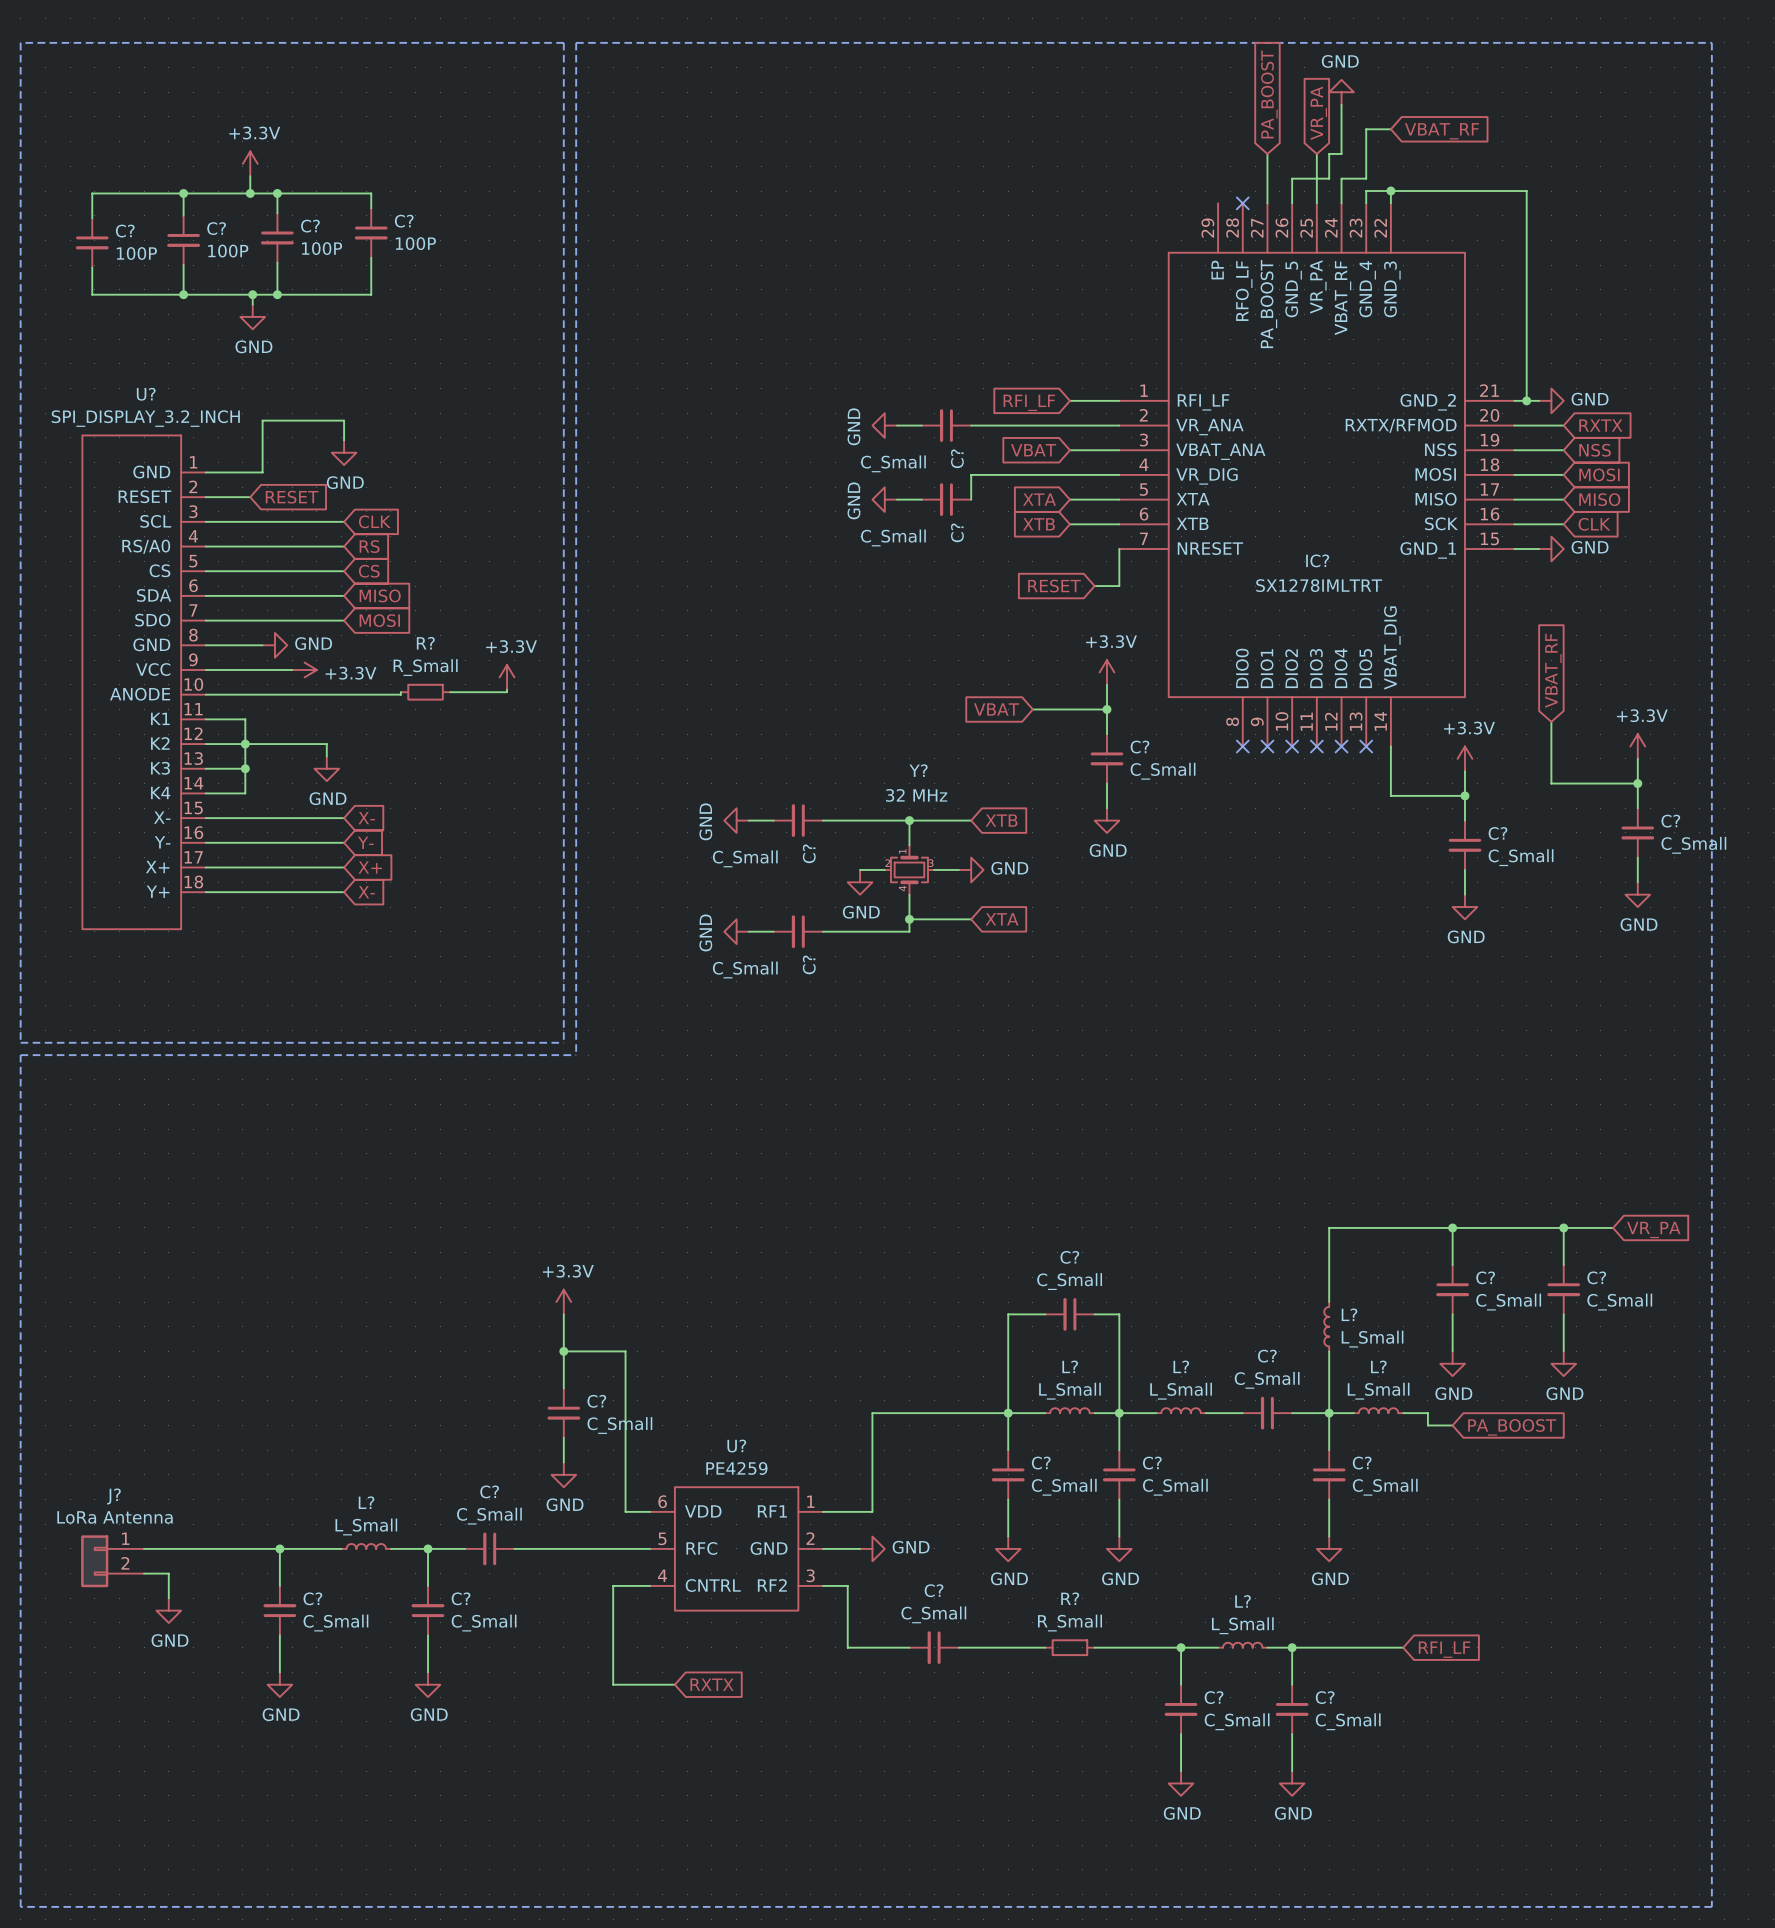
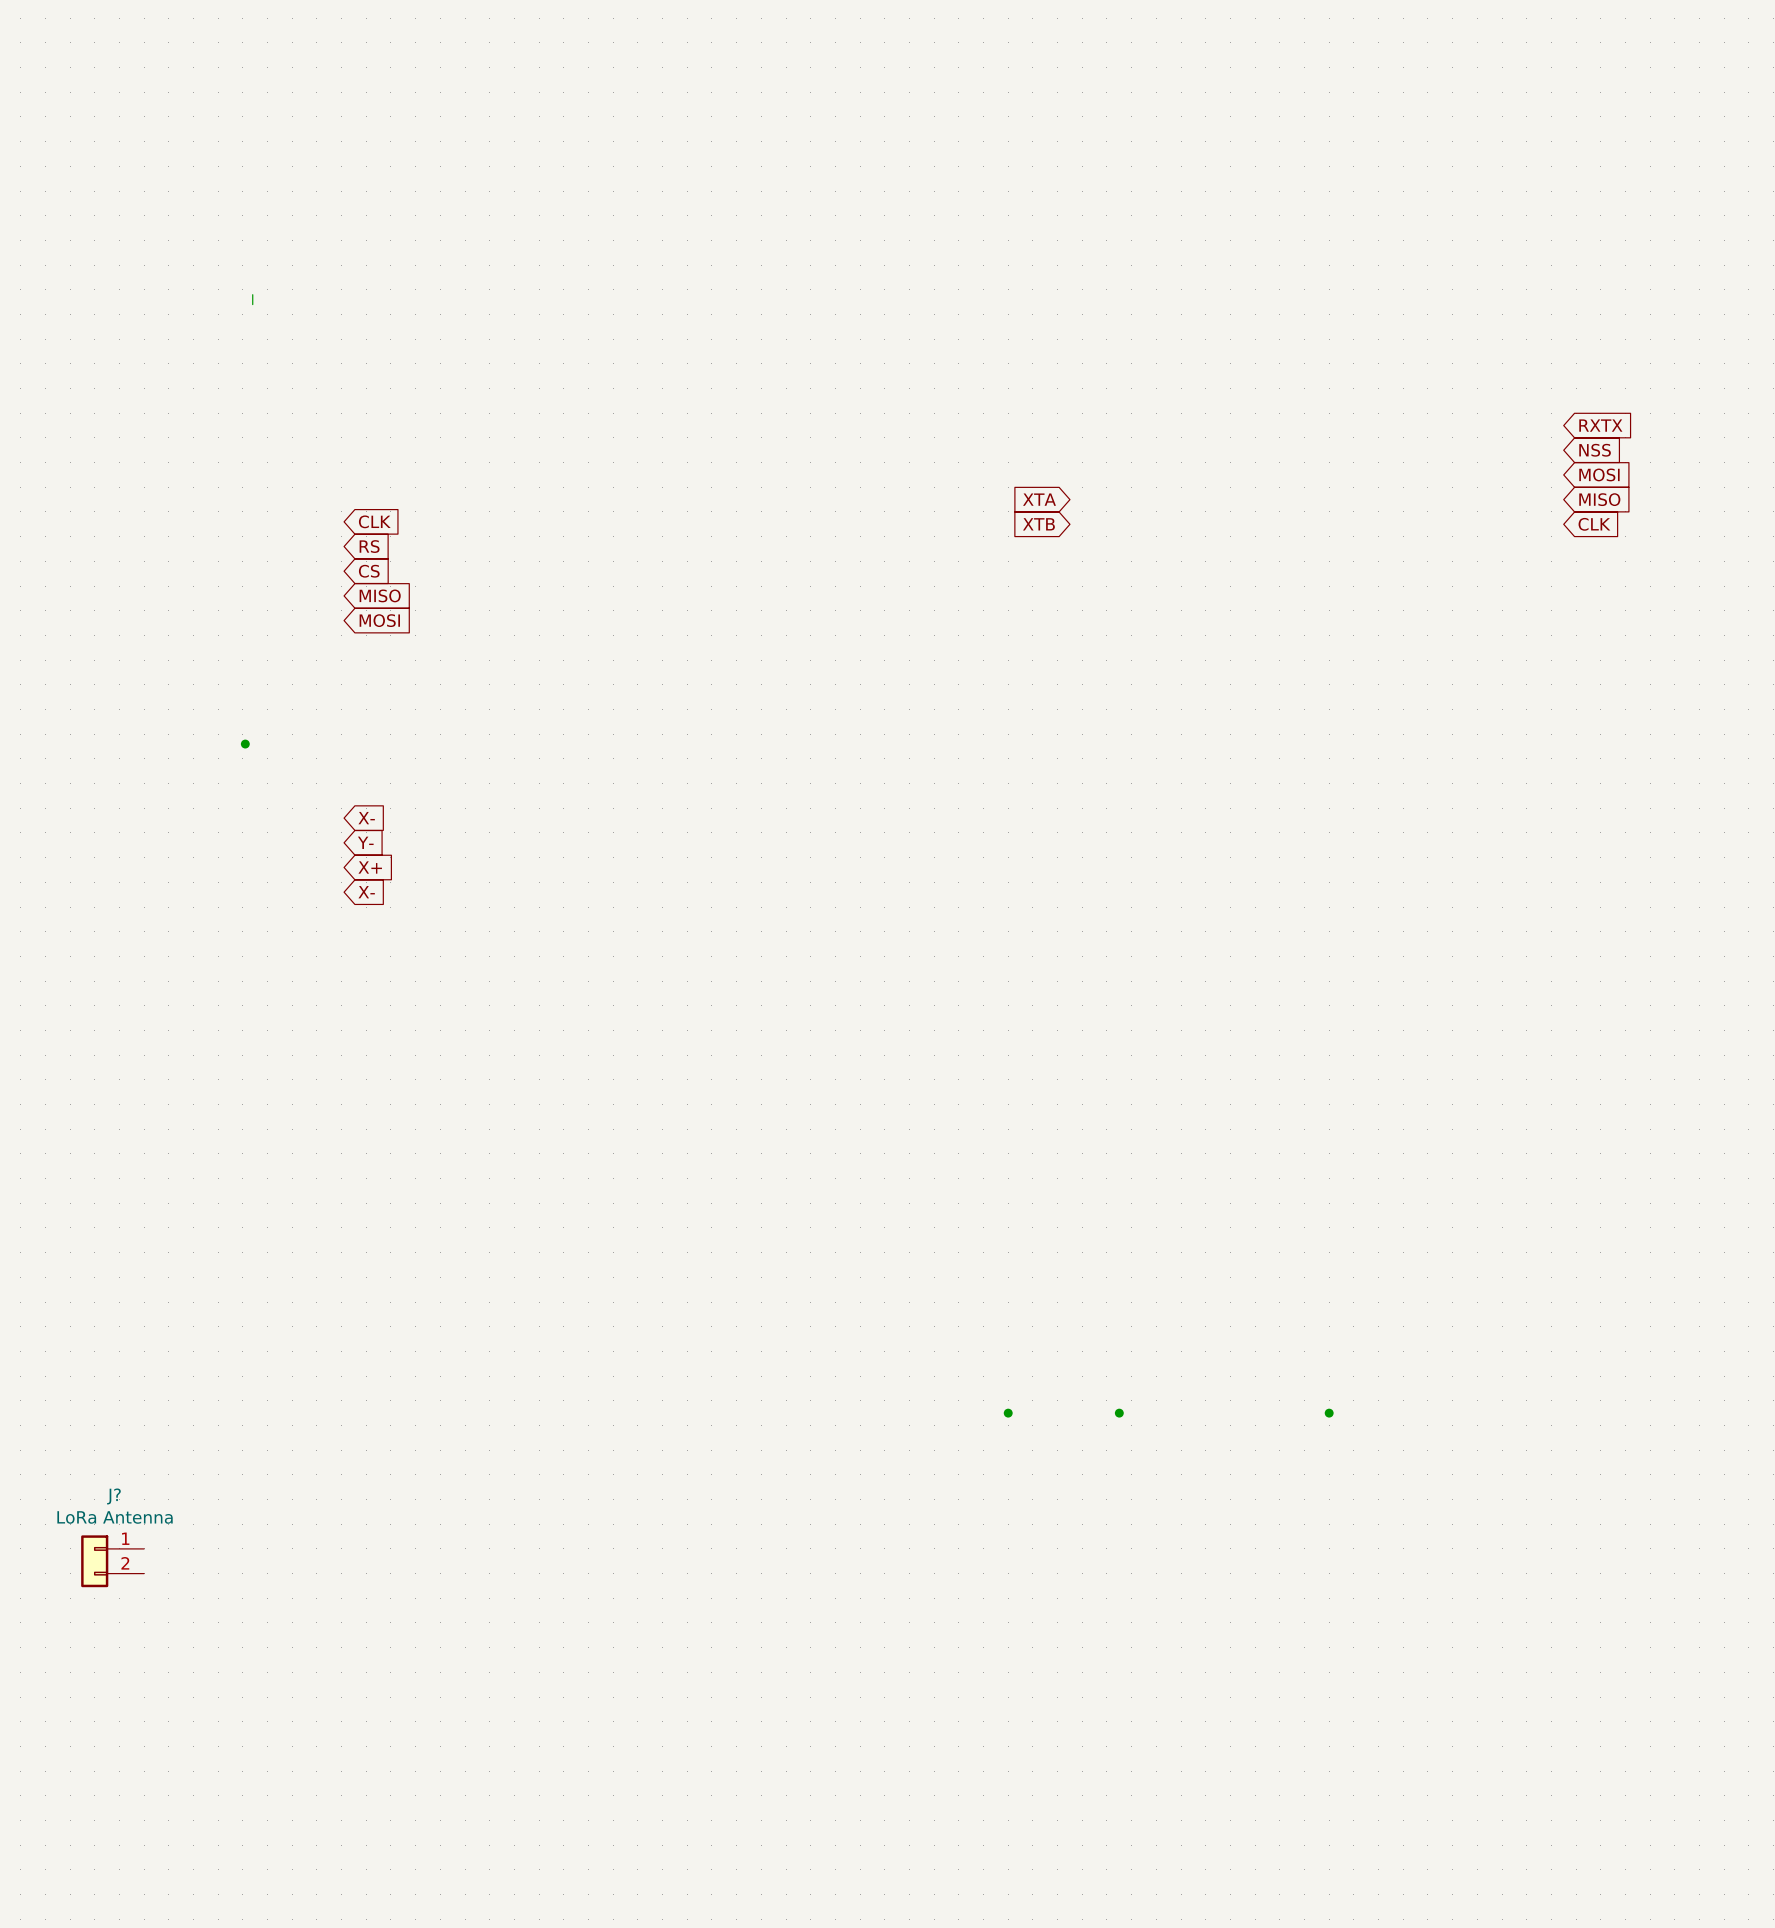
line: (20, 42) (563, 42) (563, 1042) (20, 1042) (20, 42) -> none
line: (576, 42) (1711, 42) (1711, 1906) (20, 1906) (20, 1055) (576, 1055) (576, 42) -> none
power symbol: GND (1341, 92) -> none
global label: PA_BOOST (1269, 94) -> none
wire: (1341, 104) (1341, 153) (1329, 153) (1329, 178) (1292, 178) (1292, 203) -> none
global label: VR_PA (1318, 113) -> none
wire: (1390, 129) (1366, 129) (1366, 178) (1341, 178) (1341, 203) -> none
global label: VBAT_RF (1441, 131) -> none
wire: (1267, 153) (1267, 203) -> none
wire: (1316, 153) (1316, 203) -> none
power symbol: +3.3V (250, 163) -> none
wire: (250, 176) (250, 193) -> none
wire: (1390, 191) (1390, 203) -> none
junction: (1390, 191) -> none
wire: (183, 193) (183, 215) -> none
junction: (183, 193) -> none
junction: (250, 193) -> none
wire: (277, 193) (277, 213) -> none
junction: (277, 193) -> none
no-connect mark: (1242, 203) -> none
wire: (1366, 203) (1366, 191) (1526, 191) (1526, 400) -> none
wire: (371, 208) (371, 193) (92, 193) (92, 218) -> none
C?: 100P (371, 232) -> none
C?: 100P (277, 237) -> none
C?: 100P (183, 240) -> none
C?: 100P (92, 242) -> none
wire: (371, 257) (371, 294) (92, 294) (92, 267) -> none
wire: (277, 262) (277, 294) -> none
wire: (183, 265) (183, 294) -> none
junction: (183, 294) -> none
junction: (252, 294) -> none
junction: (277, 294) -> none
power symbol: GND (252, 316) -> none
wire: (1069, 400) (1119, 400) -> none
wire: (1514, 400) (1539, 400) -> none
junction: (1526, 400) -> none
power symbol: GND (1551, 400) -> none
global label: RFI_LF (1029, 402) -> none
power symbol: GND (884, 425) -> none
wire: (897, 425) (921, 425) -> none
C?: C_Small (946, 425) -> none
wire: (971, 425) (1119, 425) -> none
wire: (1514, 425) (1563, 425) -> none
wire: (344, 440) (344, 420) (262, 420) (262, 472) (205, 472) -> none
global label: VBAT (1033, 450) -> none
wire: (1069, 450) (1119, 450) -> none
wire: (1514, 450) (1563, 450) -> none
power symbol: GND (344, 452) -> none
wire: (1119, 474) (971, 474) (971, 499) -> none
IC?: SX1278IMLTRT (1316, 474) -> none
wire: (1514, 474) (1563, 474) -> none
wire: (205, 497) (250, 497) -> none
global label: RESET (292, 497) -> none
power symbol: GND (884, 499) -> none
wire: (897, 499) (921, 499) -> none
C?: C_Small (946, 499) -> none
wire: (1069, 499) (1119, 499) -> none
wire: (1514, 499) (1563, 499) -> none
wire: (205, 521) (344, 521) -> none
wire: (1069, 524) (1119, 524) -> none
wire: (1514, 524) (1563, 524) -> none
wire: (205, 546) (344, 546) -> none
wire: (1119, 549) (1119, 586) (1094, 586) -> none
wire: (1514, 549) (1539, 549) -> none
power symbol: GND (1551, 549) -> none
wire: (205, 571) (344, 571) -> none
global label: RESET (1054, 586) -> none
wire: (205, 595) (344, 595) -> none
wire: (205, 620) (344, 620) -> none
wire: (205, 645) (262, 645) -> none
power symbol: GND (274, 645) -> none
wire: (205, 669) (292, 669) -> none
power symbol: +3.3V (304, 669) -> none
global label: VBAT_RF (1553, 670) -> none
power symbol: +3.3V (1106, 672) -> none
power symbol: +3.3V (507, 677) -> none
U?: SPI_DISPLAY_3.2_INCH (144, 682) -> none
wire: (1106, 684) (1106, 734) -> none
wire: (507, 689) (507, 692) (450, 692) -> none
wire: (400, 692) (400, 694) (205, 694) -> none
R?: R_Small (425, 692) -> none
global label: VBAT (996, 709) -> none
wire: (1032, 709) (1106, 709) -> none
junction: (1106, 709) -> none
wire: (205, 719) (245, 719) (245, 793) (205, 793) -> none
wire: (1551, 721) (1551, 783) (1637, 783) -> none
wire: (205, 744) (326, 744) (326, 756) -> none
no-connect mark: (1242, 746) -> none
no-connect mark: (1267, 746) -> none
no-connect mark: (1292, 746) -> none
no-connect mark: (1316, 746) -> none
no-connect mark: (1341, 746) -> none
no-connect mark: (1366, 746) -> none
wire: (1390, 746) (1390, 795) (1464, 795) -> none
power symbol: +3.3V (1637, 746) -> none
C?: C_Small (1106, 758) -> none
power symbol: +3.3V (1464, 758) -> none
wire: (1637, 758) (1637, 808) -> none
wire: (205, 768) (245, 768) -> none
junction: (245, 768) -> none
power symbol: GND (326, 768) -> none
wire: (1464, 771) (1464, 820) -> none
wire: (1106, 783) (1106, 808) -> none
junction: (1637, 783) -> none
junction: (1464, 795) -> none
wire: (205, 818) (344, 818) -> none
power symbol: GND (736, 820) -> none
wire: (748, 820) (773, 820) -> none
C?: C_Small (798, 820) -> none
wire: (823, 820) (971, 820) -> none
wire: (909, 820) (909, 845) -> none
junction: (909, 820) -> none
global label: XTB (1001, 820) -> none
power symbol: GND (1106, 820) -> none
C?: C_Small (1637, 832) -> none
wire: (205, 842) (344, 842) -> none
C?: C_Small (1464, 845) -> none
wire: (1637, 857) (1637, 882) -> none
wire: (205, 867) (344, 867) -> none
wire: (860, 869) (884, 869) -> none
Y?: 32 MHz (909, 869) -> none
wire: (934, 869) (958, 869) -> none
power symbol: GND (971, 869) -> none
wire: (1464, 869) (1464, 894) -> none
power symbol: GND (860, 882) -> none
wire: (205, 892) (344, 892) -> none
wire: (909, 894) (909, 931) (823, 931) -> none
power symbol: GND (1637, 894) -> none
power symbol: GND (1464, 907) -> none
wire: (909, 919) (971, 919) -> none
junction: (909, 919) -> none
global label: XTA (1002, 919) -> none
power symbol: GND (736, 931) -> none
wire: (748, 931) (773, 931) -> none
C?: C_Small (798, 931) -> none
wire: (1452, 1227) (1452, 1264) -> none
junction: (1452, 1227) -> none
wire: (1563, 1227) (1563, 1264) -> none
junction: (1563, 1227) -> none
wire: (1613, 1227) (1329, 1227) (1329, 1302) -> none
global label: VR_PA (1653, 1229) -> none
C?: C_Small (1452, 1289) -> none
C?: C_Small (1563, 1289) -> none
power symbol: +3.3V (563, 1302) -> none
wire: (563, 1314) (563, 1388) -> none
wire: (1045, 1314) (1008, 1314) (1008, 1450) -> none
C?: C_Small (1069, 1314) -> none
wire: (1094, 1314) (1119, 1314) (1119, 1450) -> none
wire: (1452, 1314) (1452, 1351) -> none
wire: (1563, 1314) (1563, 1351) -> none
L?: L_Small (1326, 1326) -> none
wire: (563, 1351) (625, 1351) (625, 1511) (650, 1511) -> none
junction: (563, 1351) -> none
wire: (1329, 1351) (1329, 1450) -> none
power symbol: GND (1452, 1363) -> none
power symbol: GND (1563, 1363) -> none
L?: L_Small (1069, 1410) -> none
L?: L_Small (1181, 1410) -> none
L?: L_Small (1378, 1410) -> none
C?: C_Small (563, 1413) -> none
wire: (1045, 1413) (872, 1413) (872, 1511) (823, 1511) -> none
wire: (1094, 1413) (1156, 1413) -> none
wire: (1205, 1413) (1242, 1413) -> none
C?: C_Small (1267, 1413) -> none
wire: (1292, 1413) (1353, 1413) -> none
wire: (1403, 1413) (1427, 1413) (1427, 1425) (1452, 1425) -> none
global label: PA_BOOST (1512, 1427) -> none
wire: (563, 1437) (563, 1462) -> none
power symbol: GND (563, 1474) -> none
C?: C_Small (1008, 1474) -> none
C?: C_Small (1119, 1474) -> none
C?: C_Small (1329, 1474) -> none
wire: (1008, 1499) (1008, 1536) -> none
wire: (1119, 1499) (1119, 1536) -> none
wire: (1329, 1499) (1329, 1536) -> none
L?: L_Small (366, 1546) -> none
wire: (144, 1548) (341, 1548) -> none
wire: (279, 1548) (279, 1585) -> none
junction: (279, 1548) -> none
wire: (390, 1548) (465, 1548) -> none
wire: (428, 1548) (428, 1585) -> none
junction: (428, 1548) -> none
C?: C_Small (489, 1548) -> none
wire: (514, 1548) (650, 1548) -> none
U?: PE4259 (736, 1548) -> none
wire: (823, 1548) (860, 1548) -> none
power symbol: GND (872, 1548) -> none
power symbol: GND (1008, 1548) -> none
power symbol: GND (1119, 1548) -> none
power symbol: GND (1329, 1548) -> none
wire: (144, 1573) (168, 1573) (168, 1598) -> none
wire: (650, 1585) (613, 1585) (613, 1684) (674, 1684) -> none
wire: (823, 1585) (847, 1585) (847, 1647) (909, 1647) -> none
power symbol: GND (168, 1610) -> none
C?: C_Small (279, 1610) -> none
C?: C_Small (428, 1610) -> none
wire: (279, 1635) (279, 1672) -> none
wire: (428, 1635) (428, 1672) -> none
L?: L_Small (1242, 1645) -> none
C?: C_Small (934, 1647) -> none
wire: (958, 1647) (1045, 1647) -> none
R?: R_Small (1069, 1647) -> none
wire: (1094, 1647) (1218, 1647) -> none
wire: (1181, 1647) (1181, 1684) -> none
junction: (1181, 1647) -> none
wire: (1267, 1647) (1403, 1647) -> none
wire: (1292, 1647) (1292, 1684) -> none
junction: (1292, 1647) -> none
global label: RFI_LF (1444, 1649) -> none
power symbol: GND (279, 1684) -> none
power symbol: GND (428, 1684) -> none
global label: RXTX (712, 1684) -> none
C?: C_Small (1181, 1709) -> none
C?: C_Small (1292, 1709) -> none
wire: (1181, 1734) (1181, 1771) -> none
wire: (1292, 1734) (1292, 1771) -> none
power symbol: GND (1181, 1783) -> none
power symbol: GND (1292, 1783) -> none

